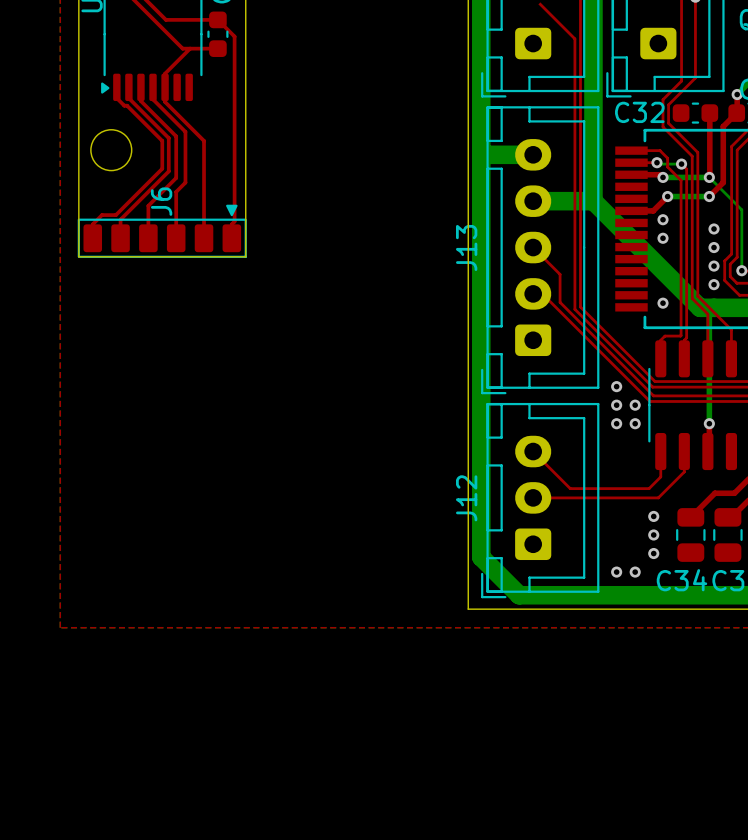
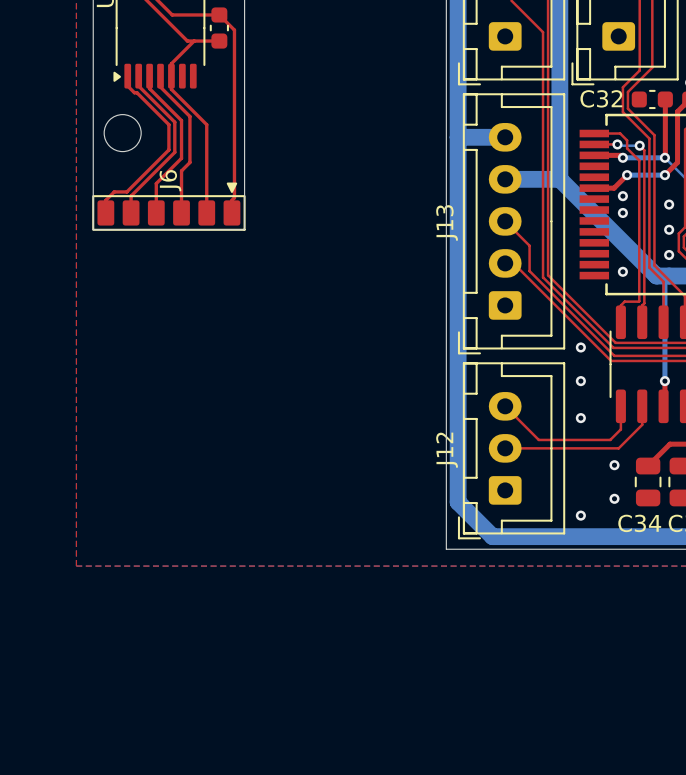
via: (714, 247) -> none
via: none -> (669, 229)
via: (714, 266) -> none
via: (616, 405) -> none
via: (635, 405) -> none
via: (635, 423) -> none
via: none -> (580, 418)
via: (653, 534) -> none
via: (635, 572) -> none

